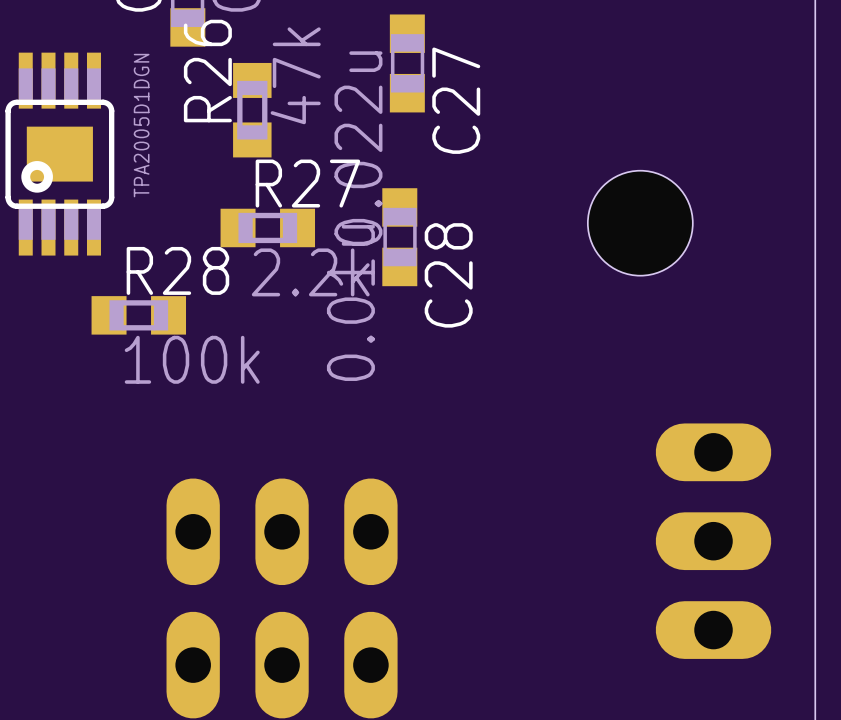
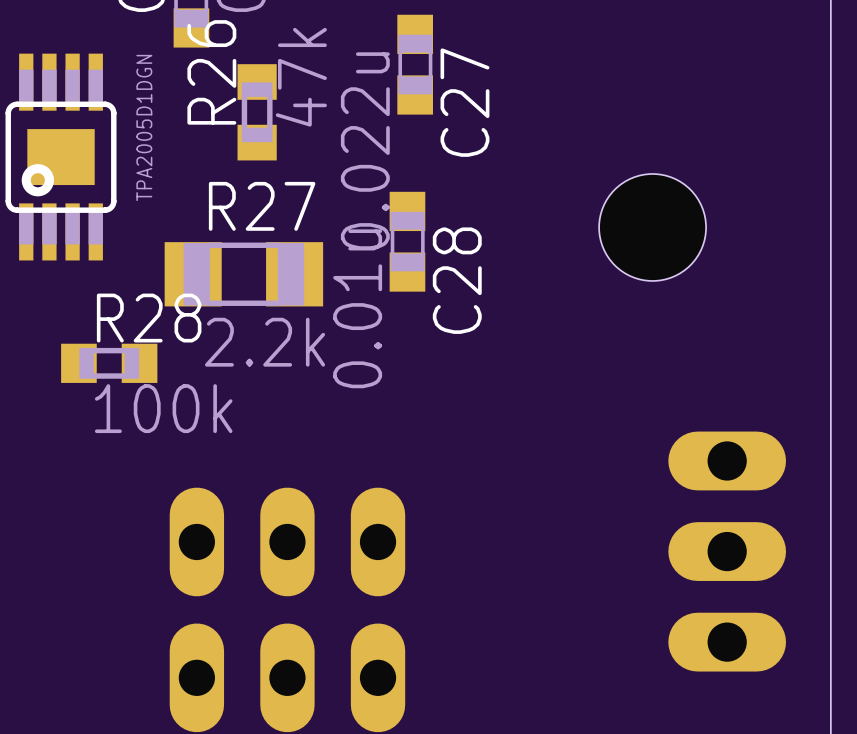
R27 footprint: [220, 208, 316, 248] -> [164, 242, 324, 307]
R28 position: (138, 315) -> (109, 363)

